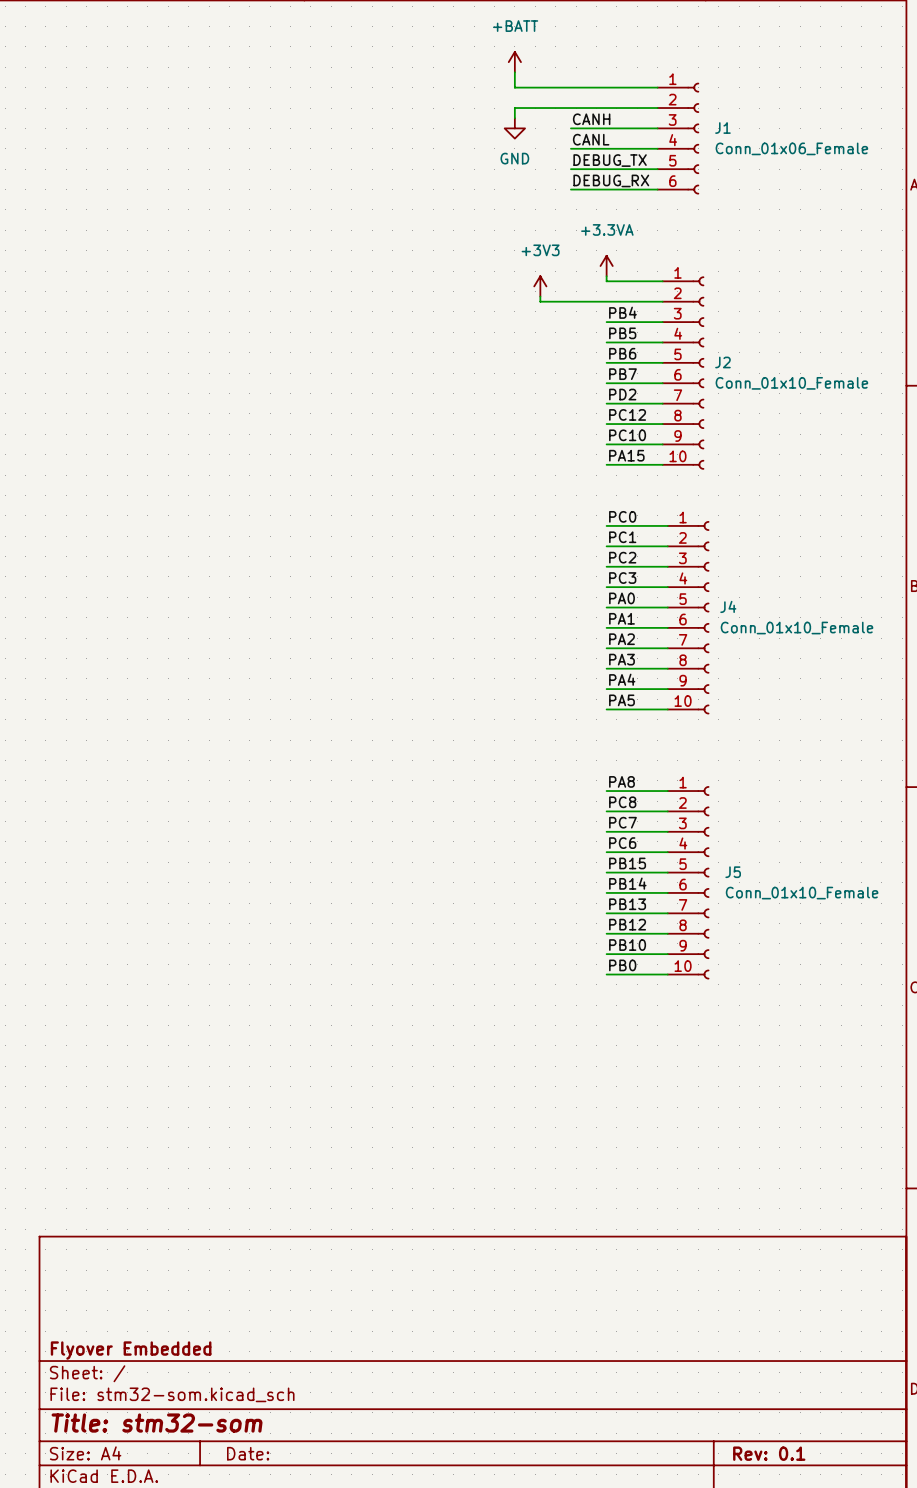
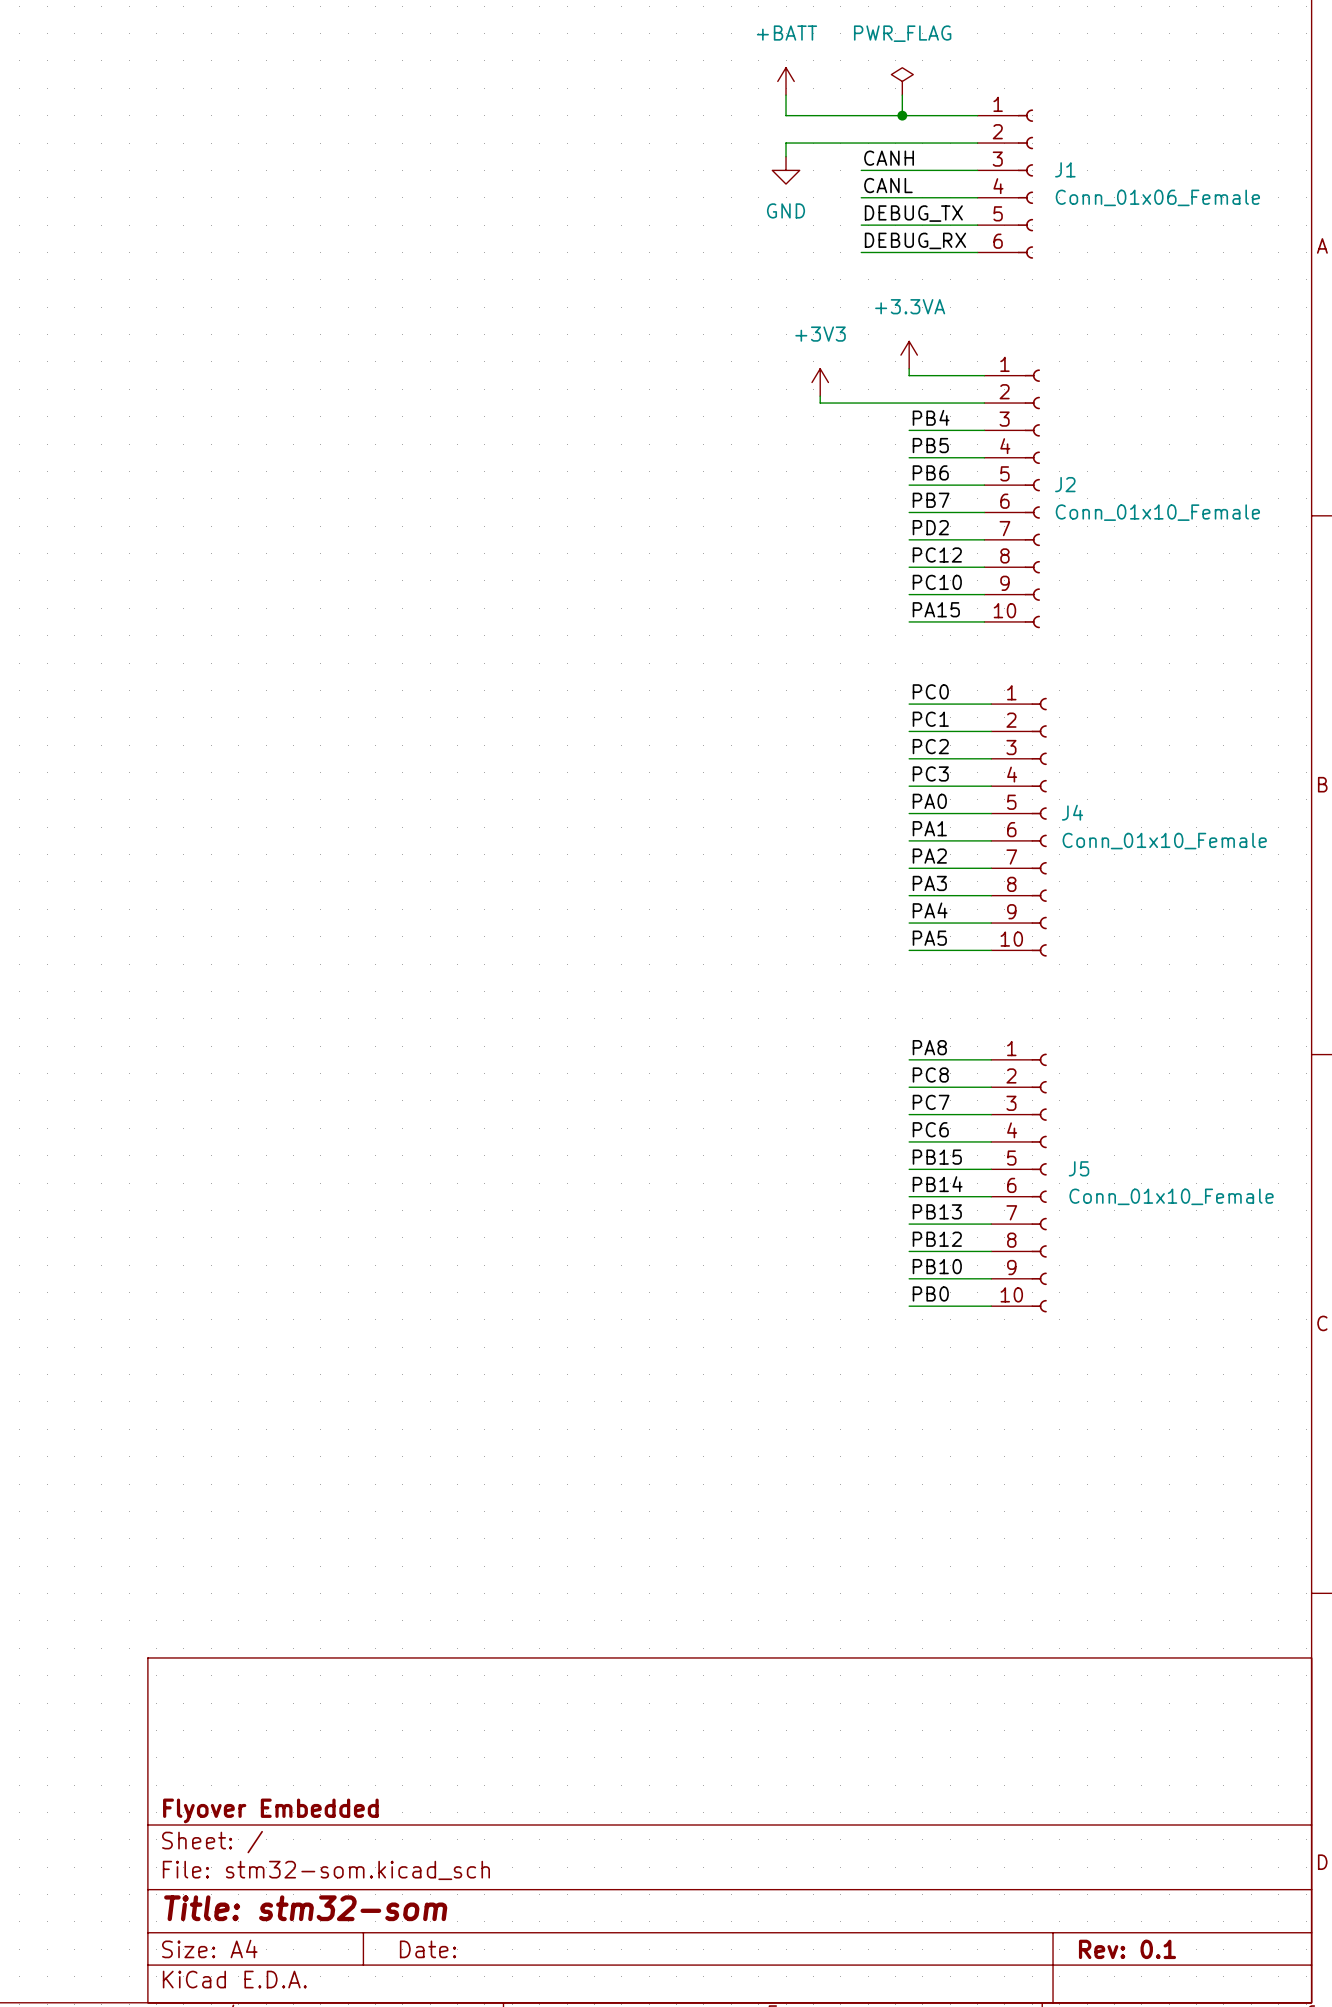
power symbol: none -> PWR_FLAG (902, 81)
wire: none -> (902, 95) (902, 115)
junction: none -> (902, 115)

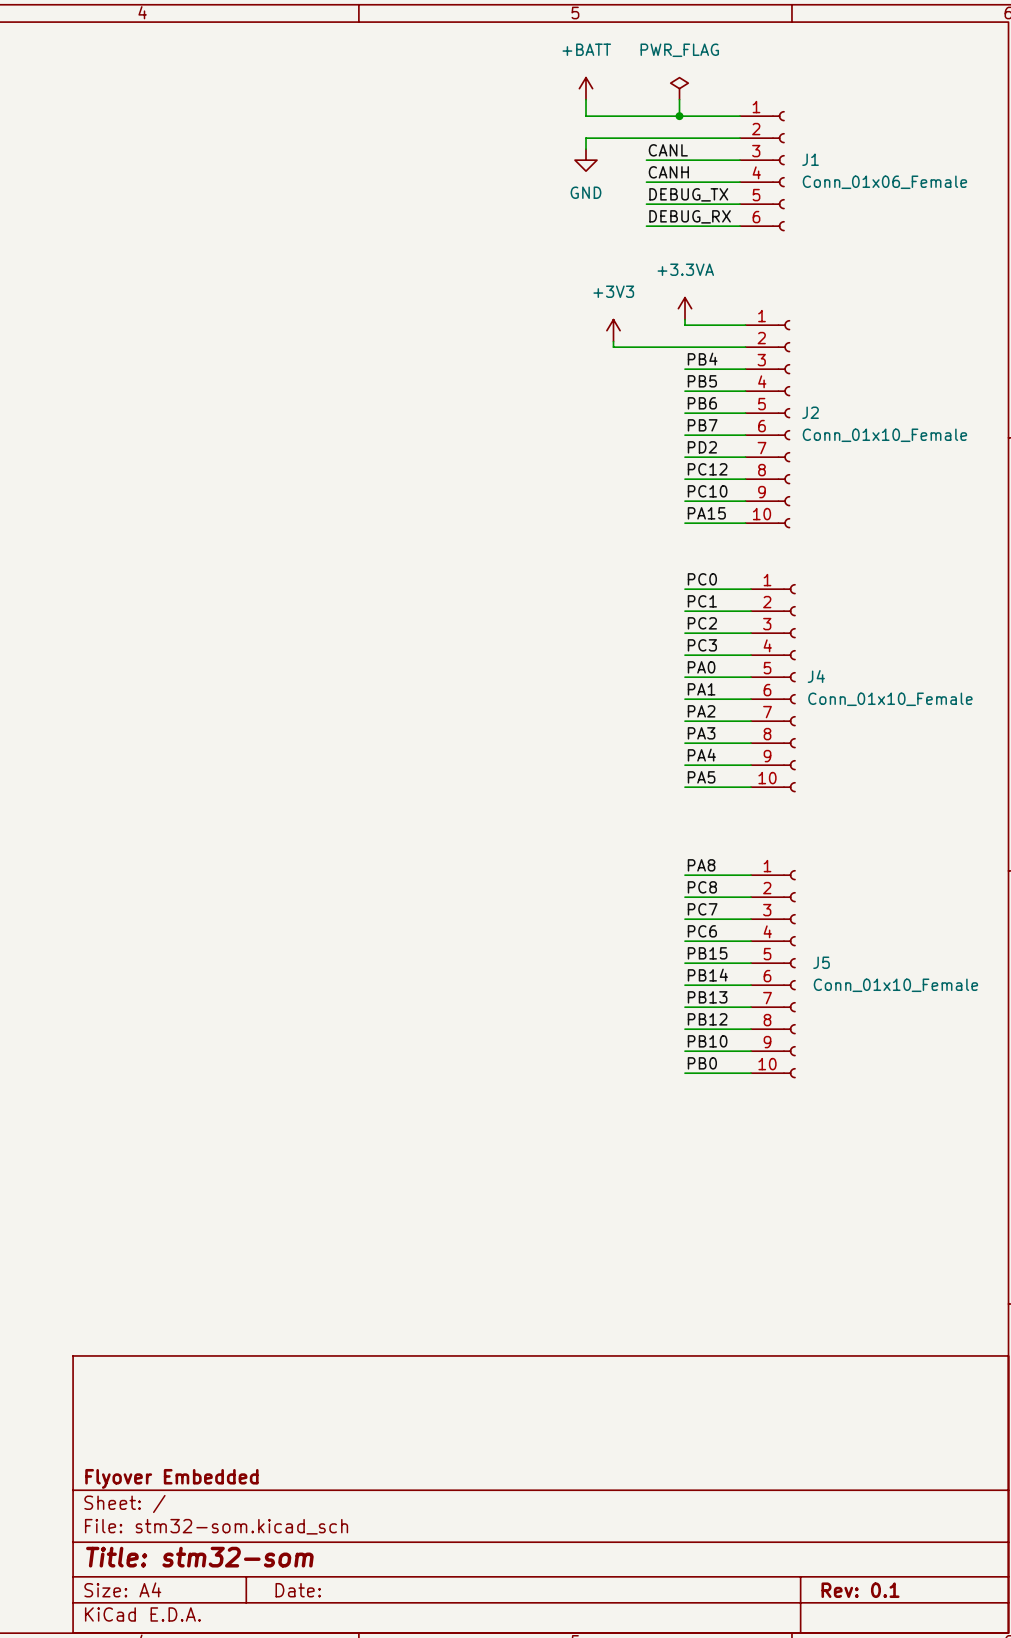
label: CANH (889, 158) -> CANL (668, 150)
label: CANL (888, 185) -> CANH (668, 172)

